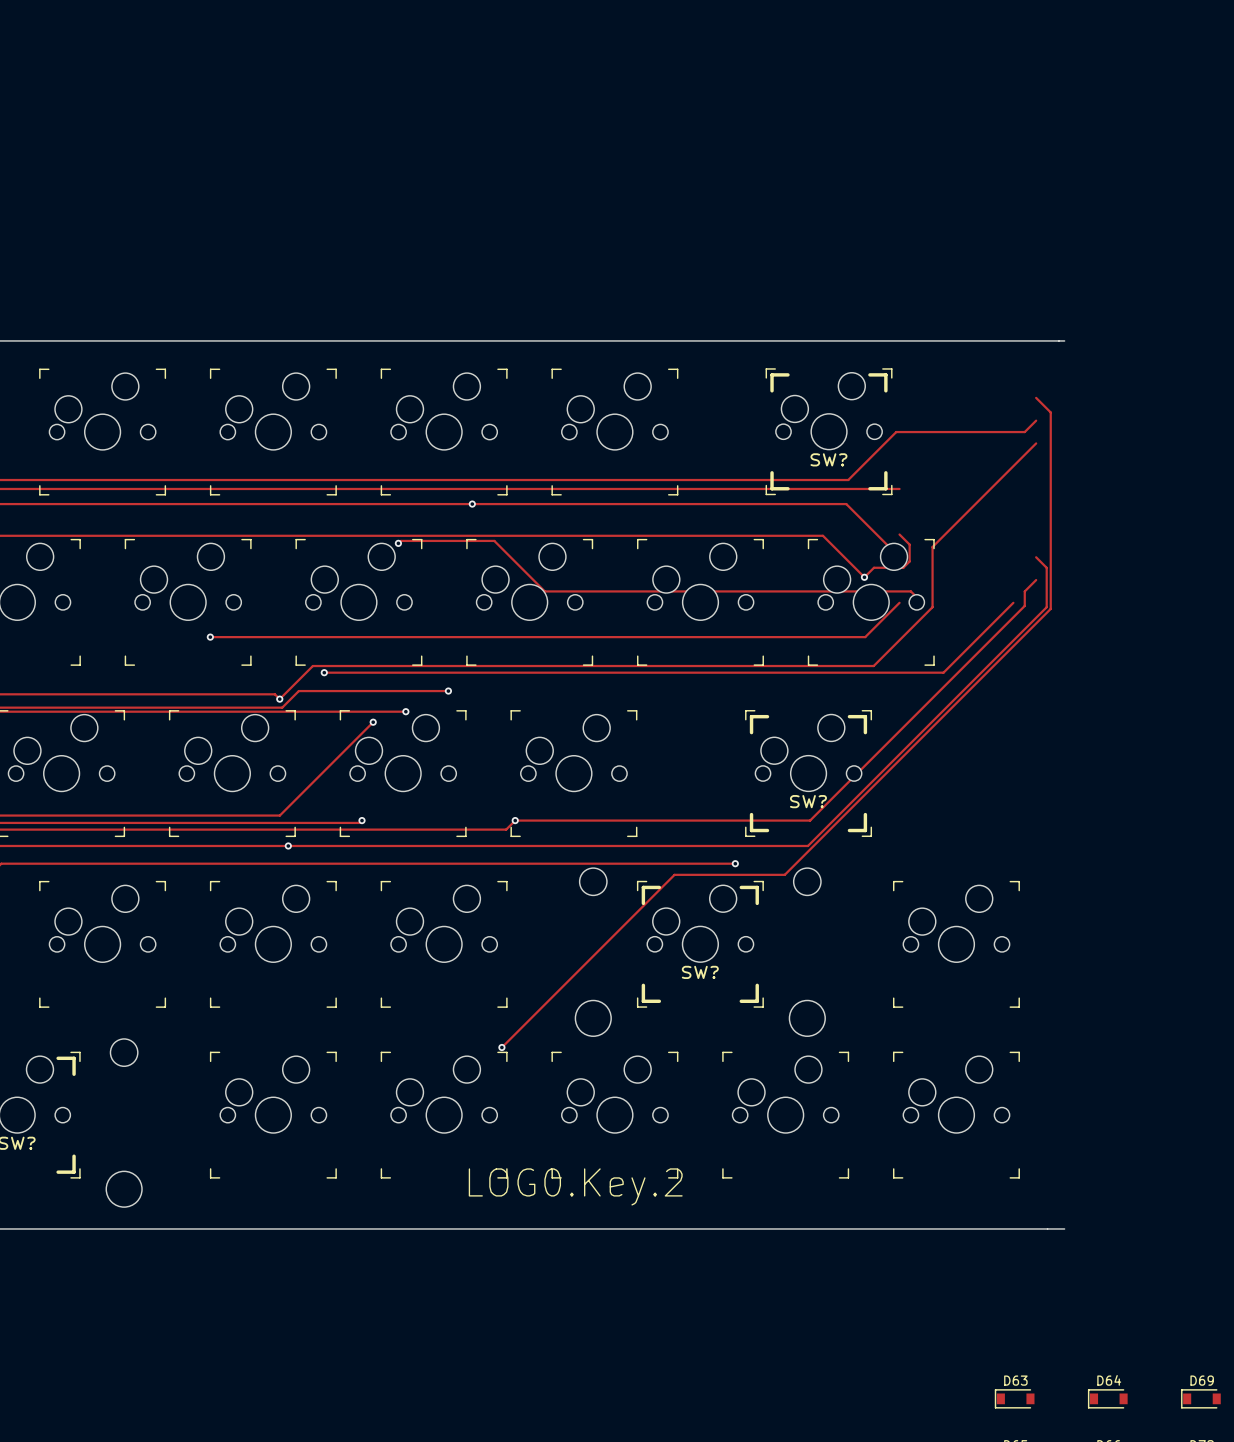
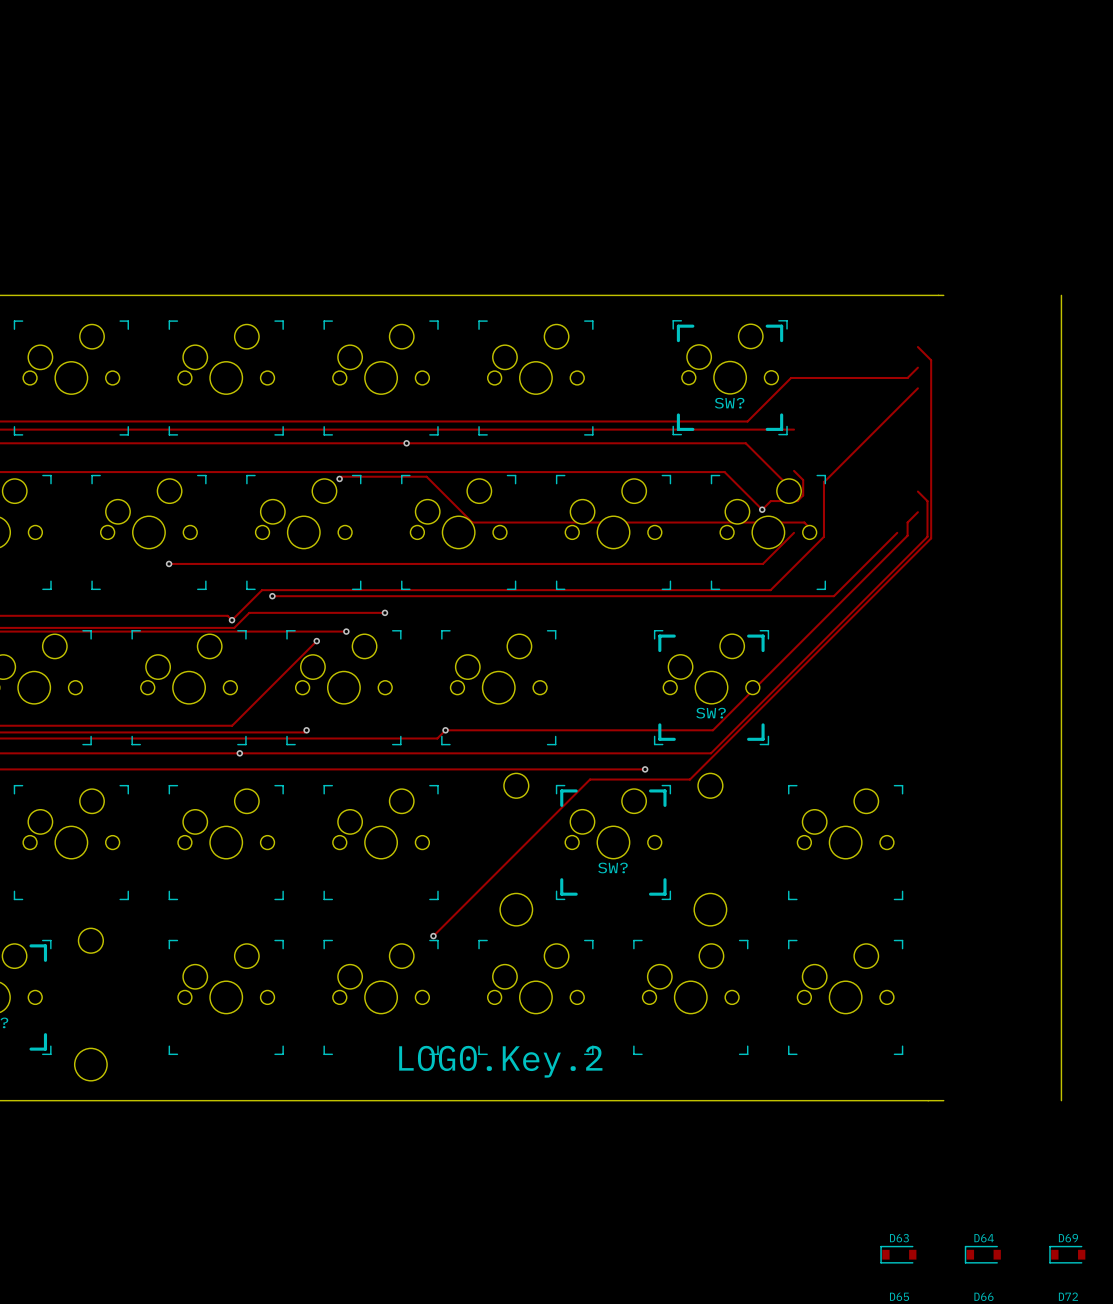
board edge: none -> (1061, 295) (1061, 1100)

